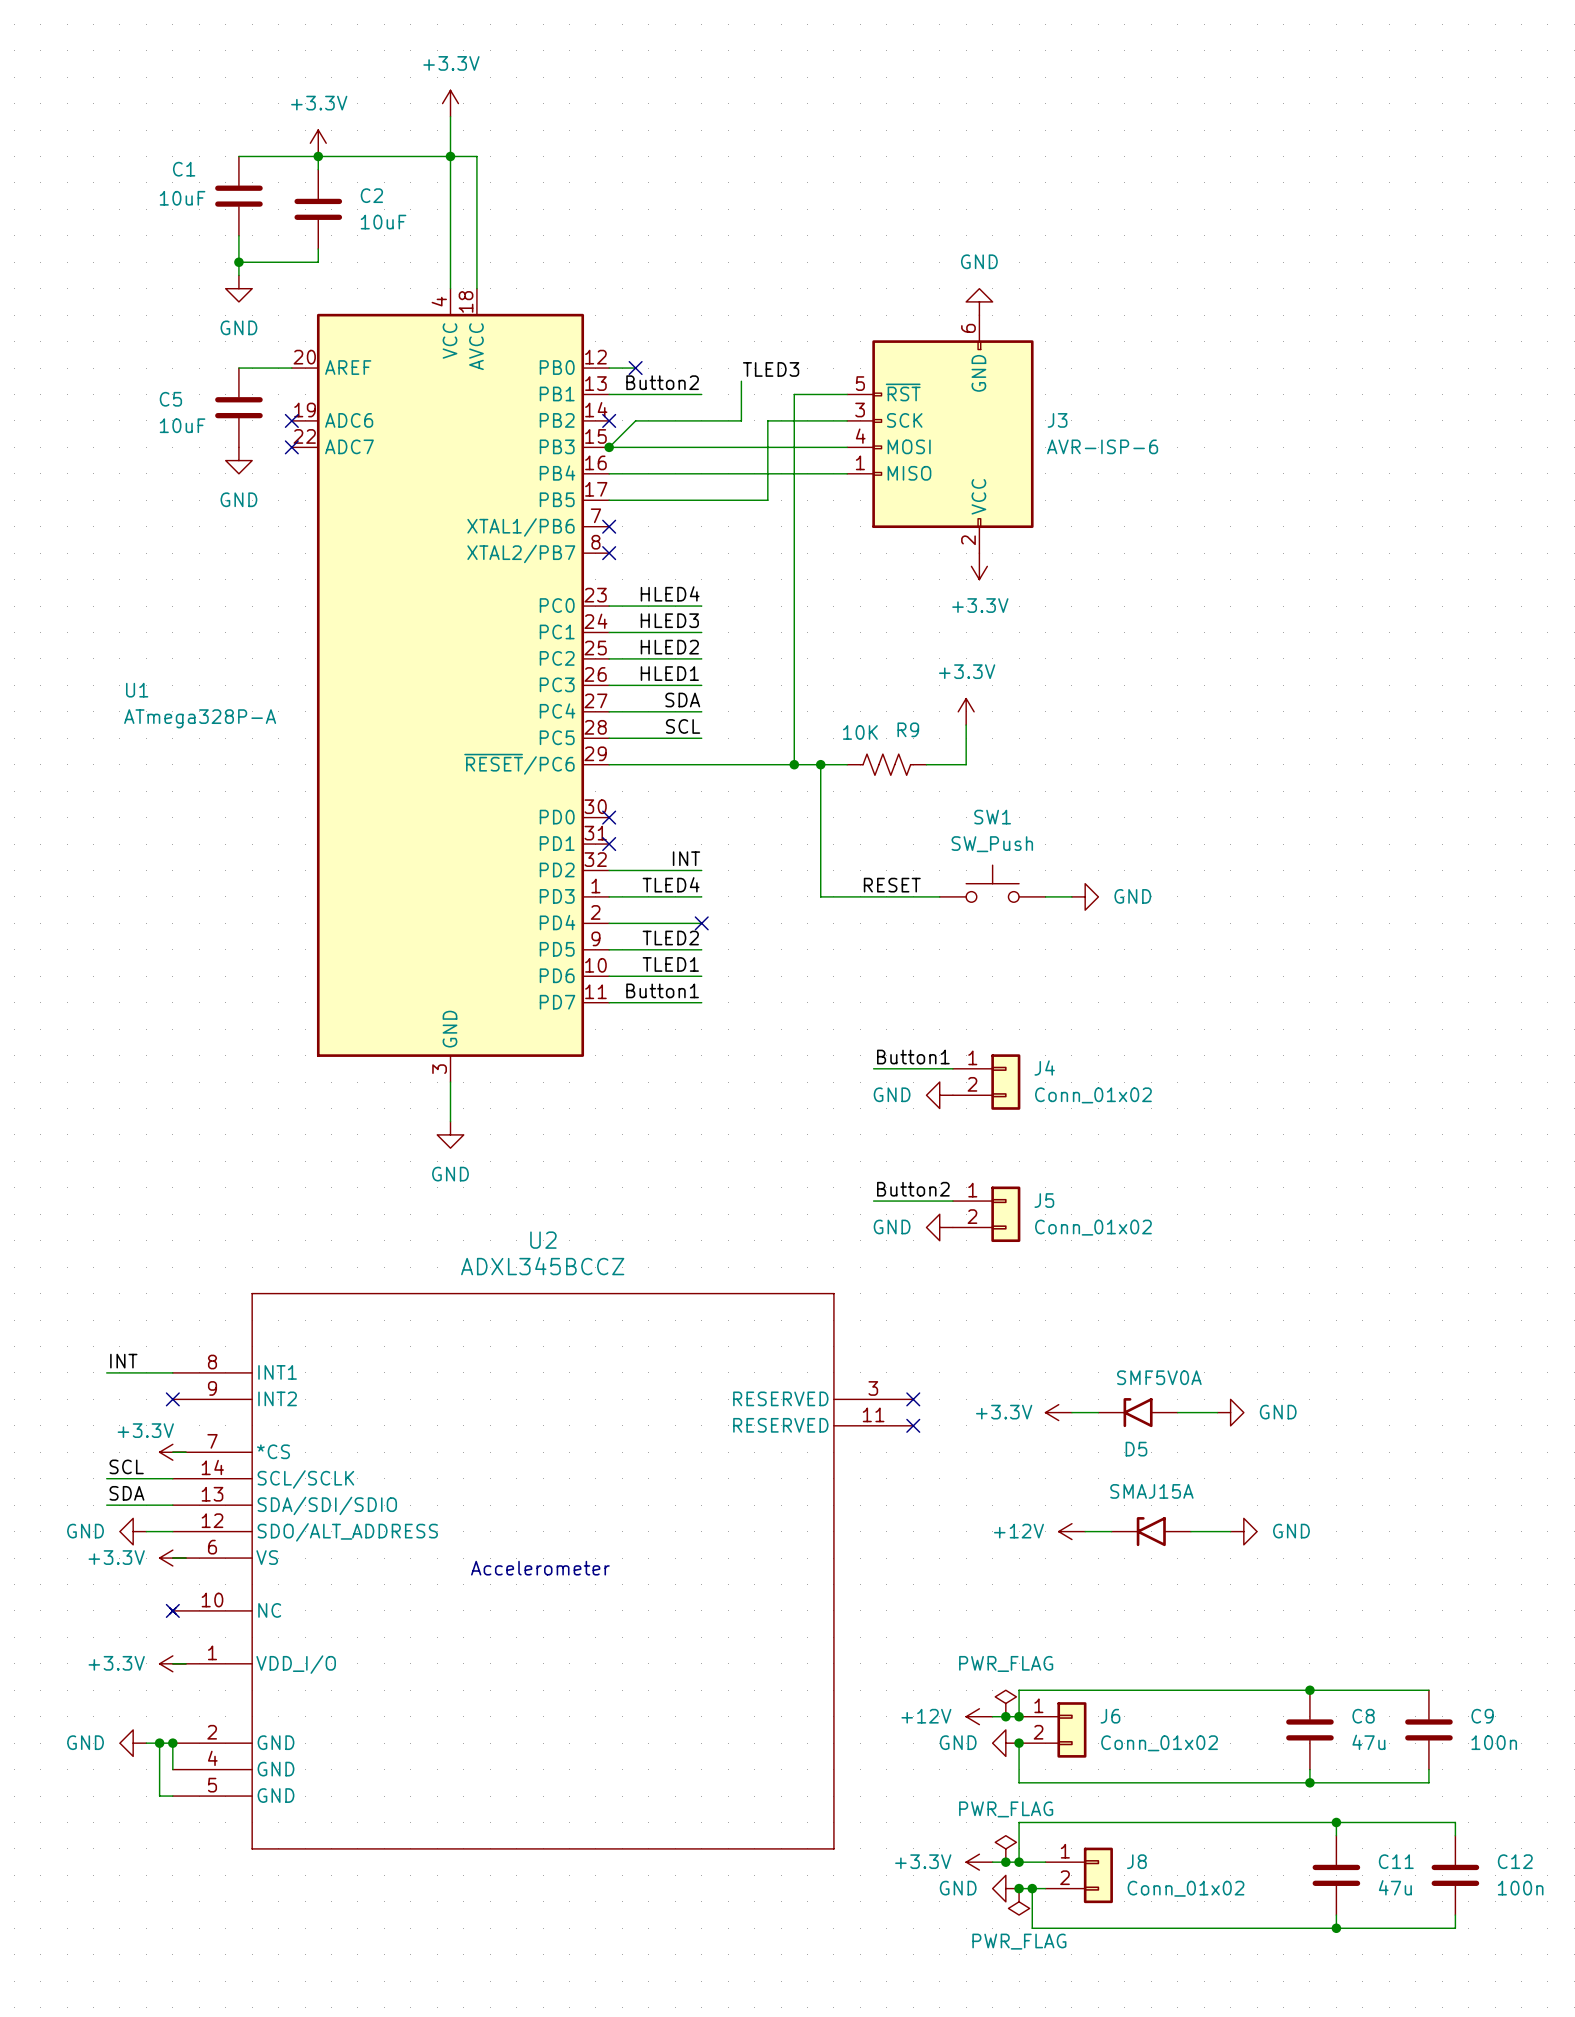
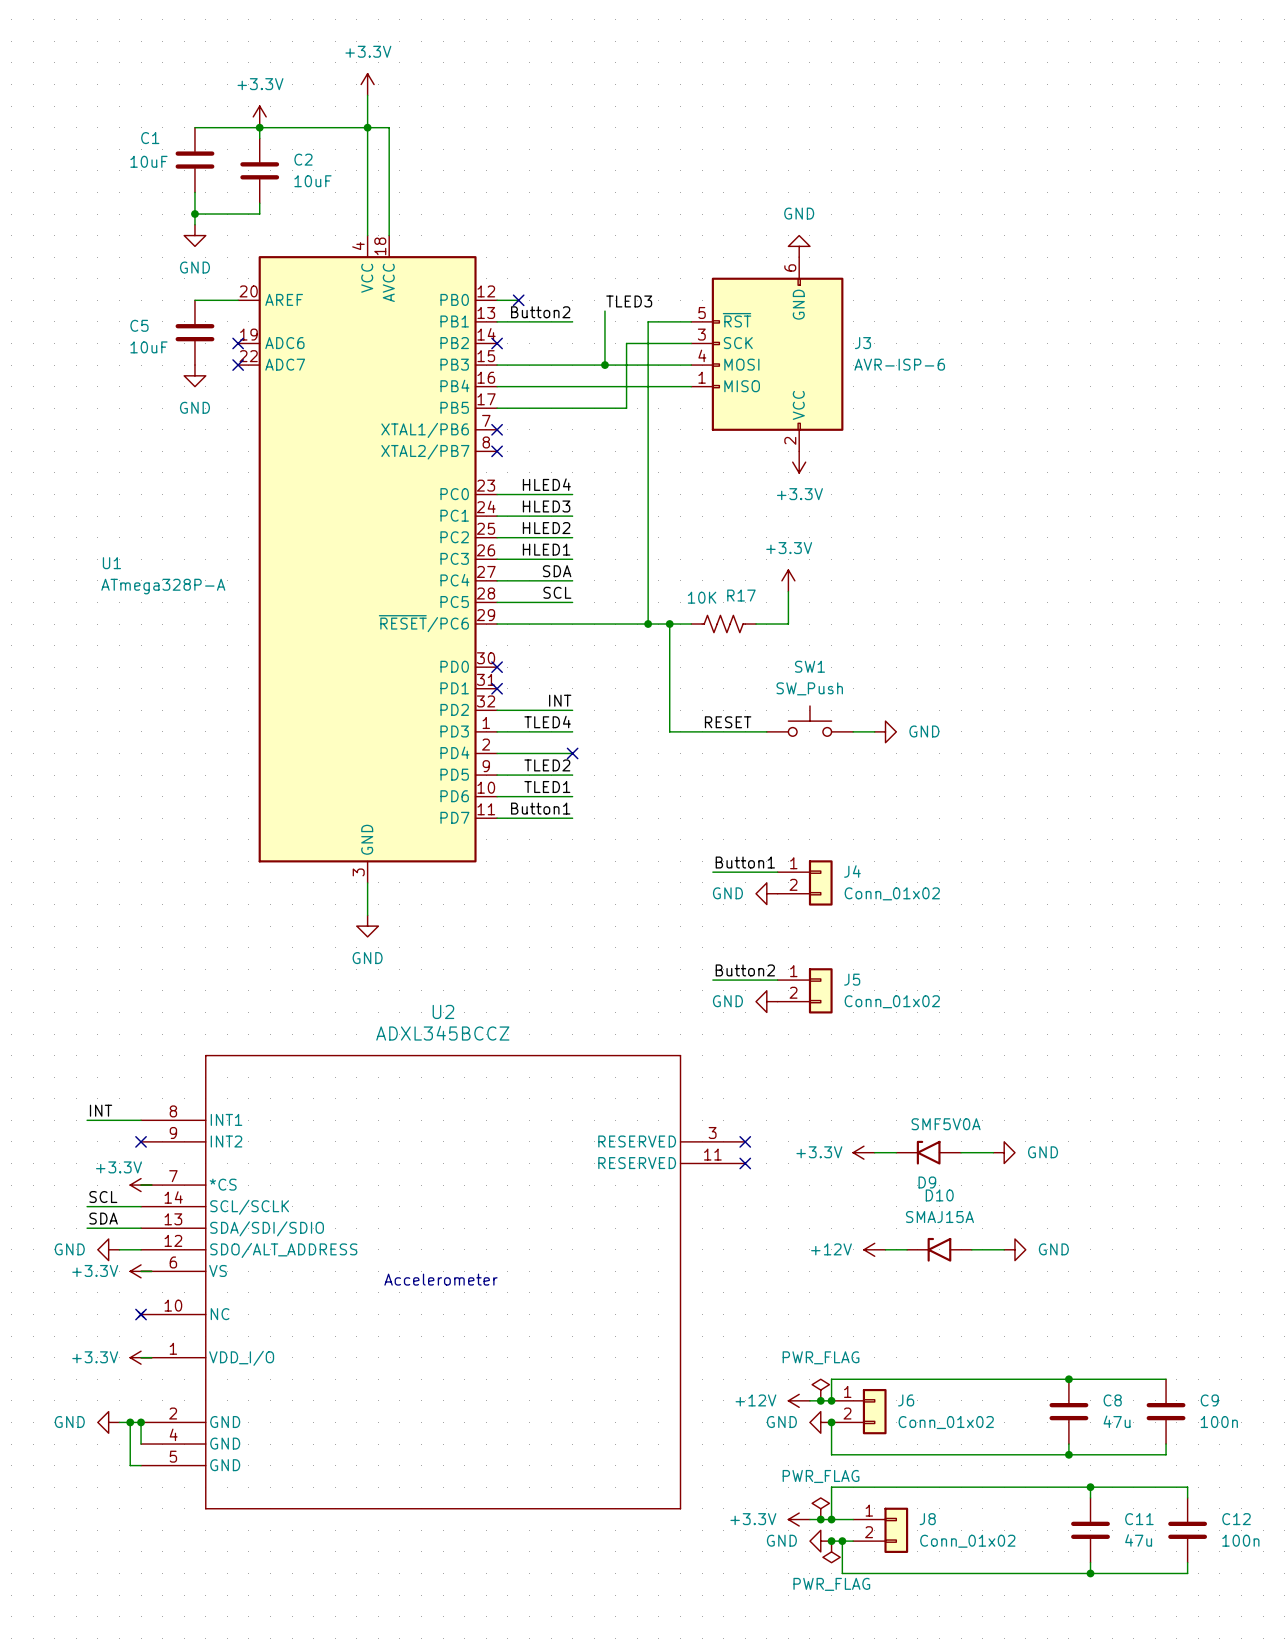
wire: (741, 420) (635, 420) (609, 447) -> (604, 343) (604, 365)
junction: (609, 447) -> none
junction: none -> (604, 365)
R9 name: R9 (908, 729) -> R17 (741, 595)
D5 name: D5 (1136, 1449) -> D9 (927, 1182)
D10 name: none -> D10 (939, 1195)

